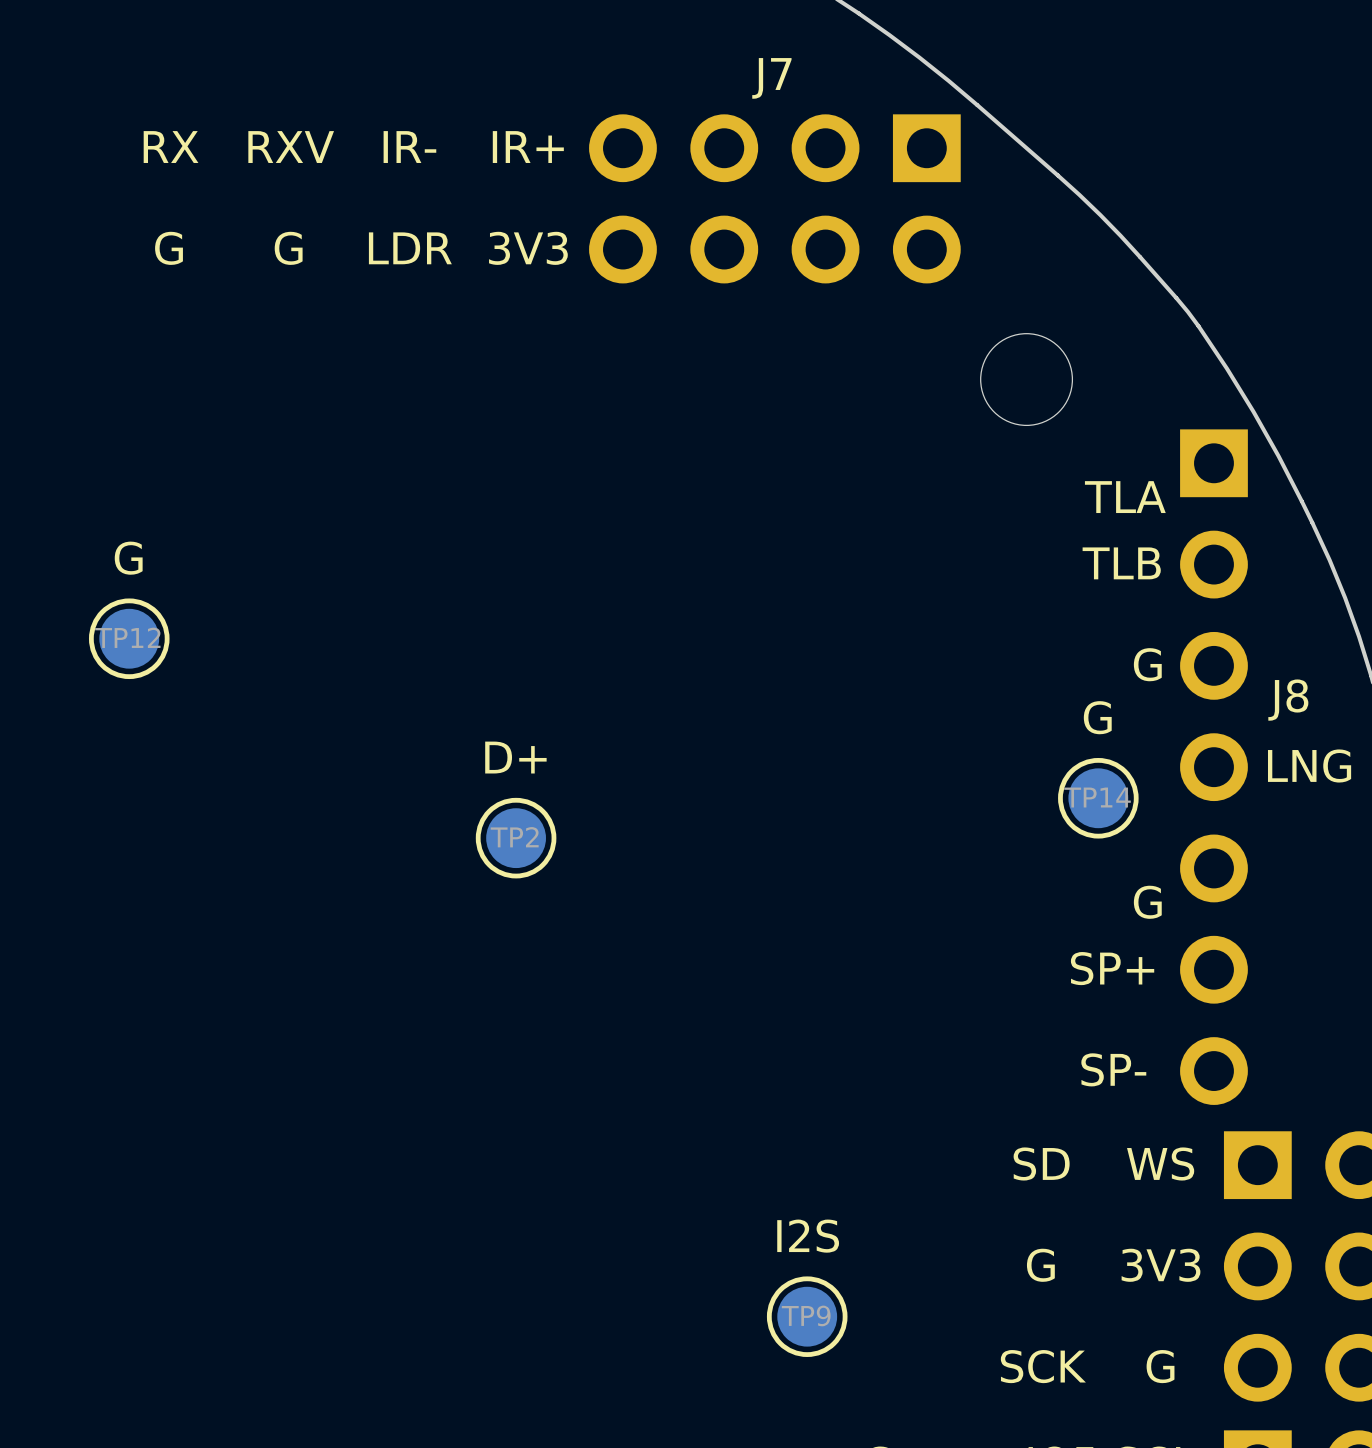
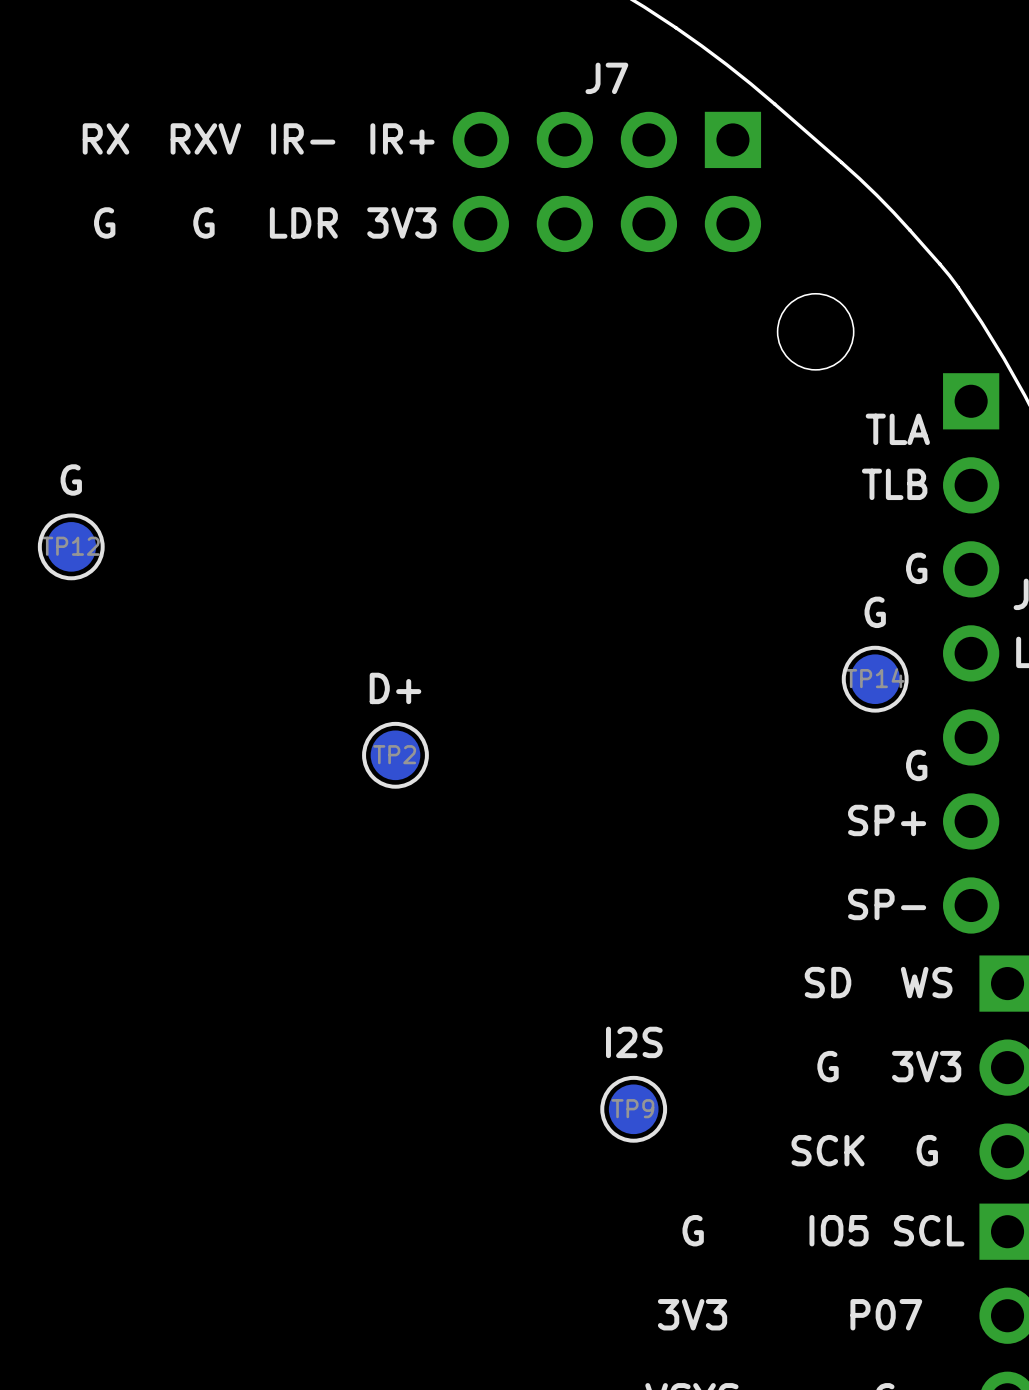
text position: D+ (515, 757) -> D+ (395, 688)
TP2 position: (516, 838) -> (395, 755)

